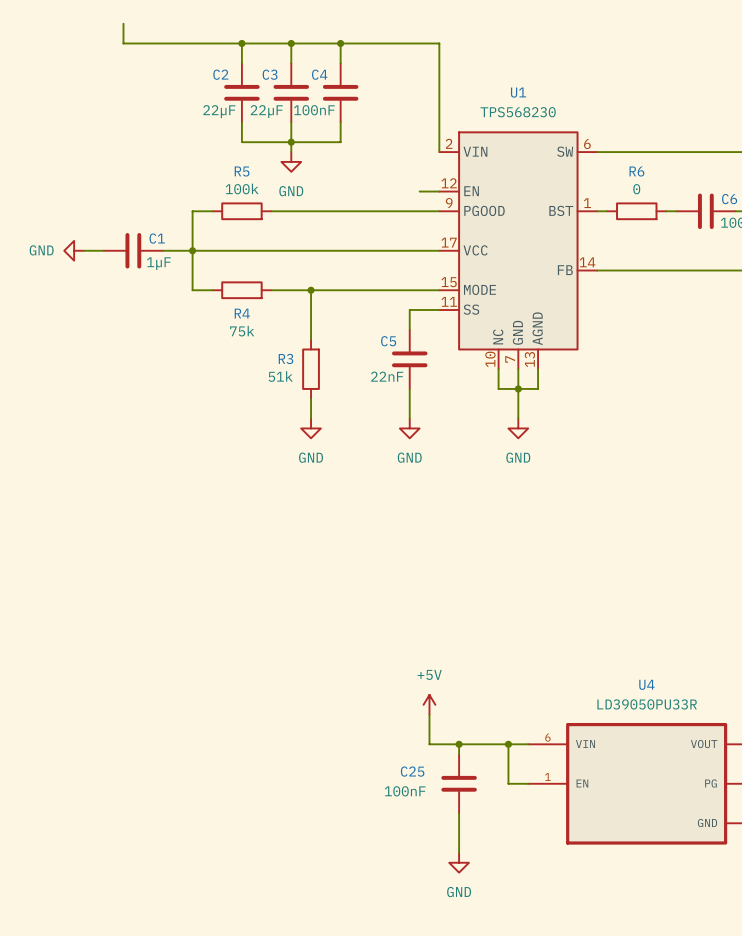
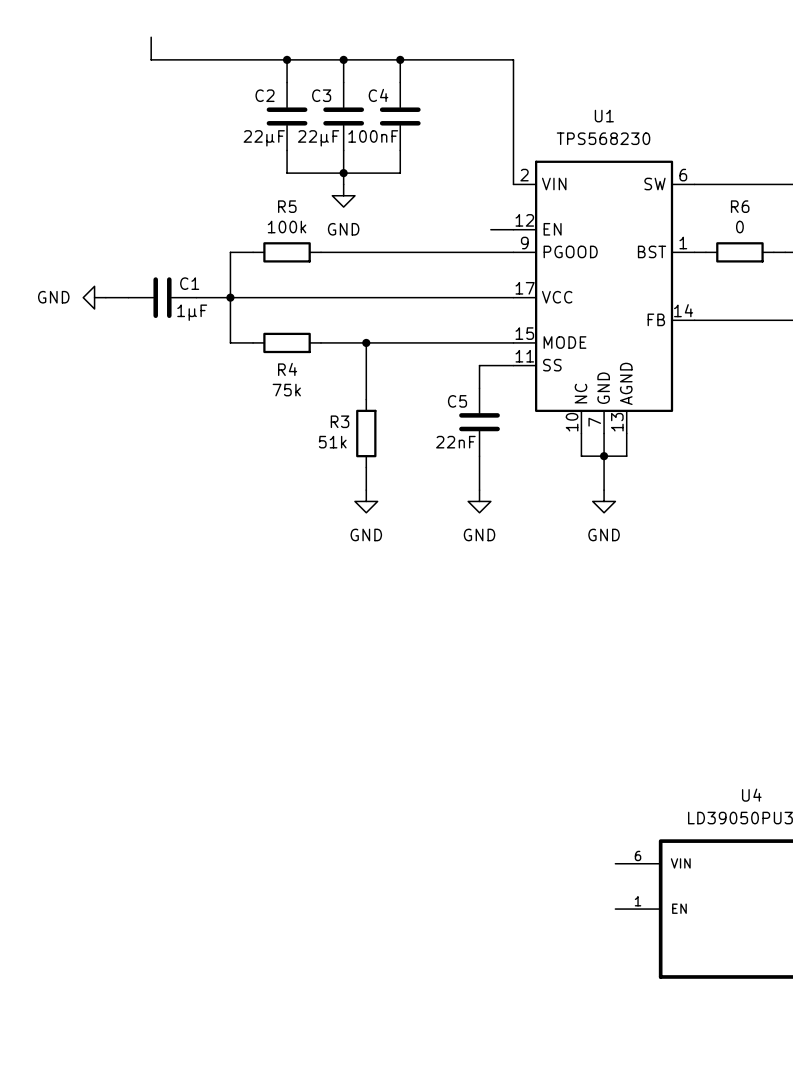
power symbol: +5V (429, 704) -> none
wire: (429, 714) (429, 744) (528, 744) -> none
wire: (459, 744) (459, 754) -> none
junction: (459, 744) -> none
wire: (508, 744) (508, 783) (528, 783) -> none
junction: (508, 744) -> none
C25: 100nF (459, 783) -> none
wire: (459, 813) (459, 852) -> none
power symbol: GND (459, 862) -> none

